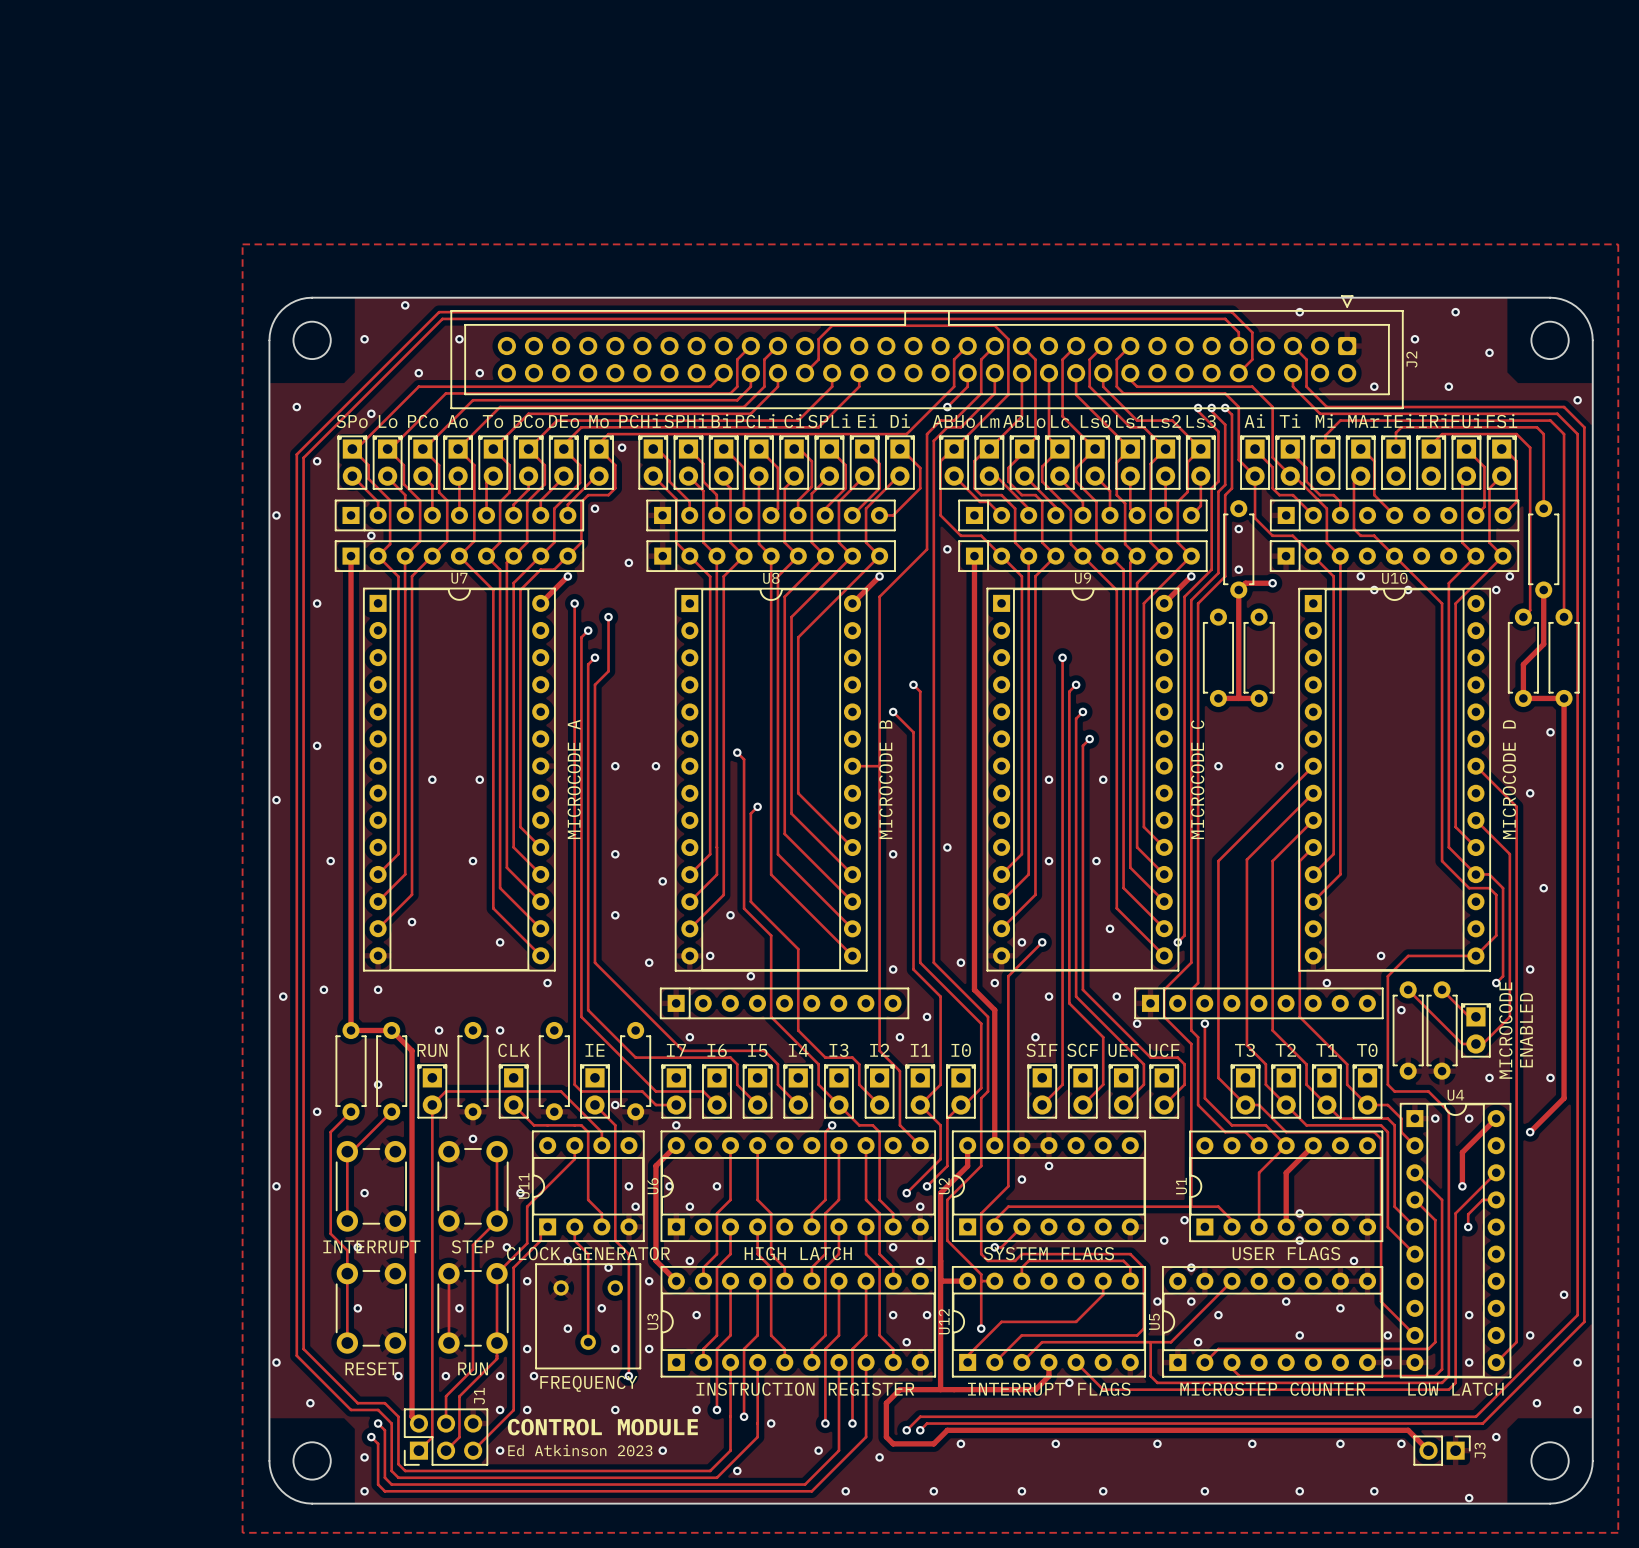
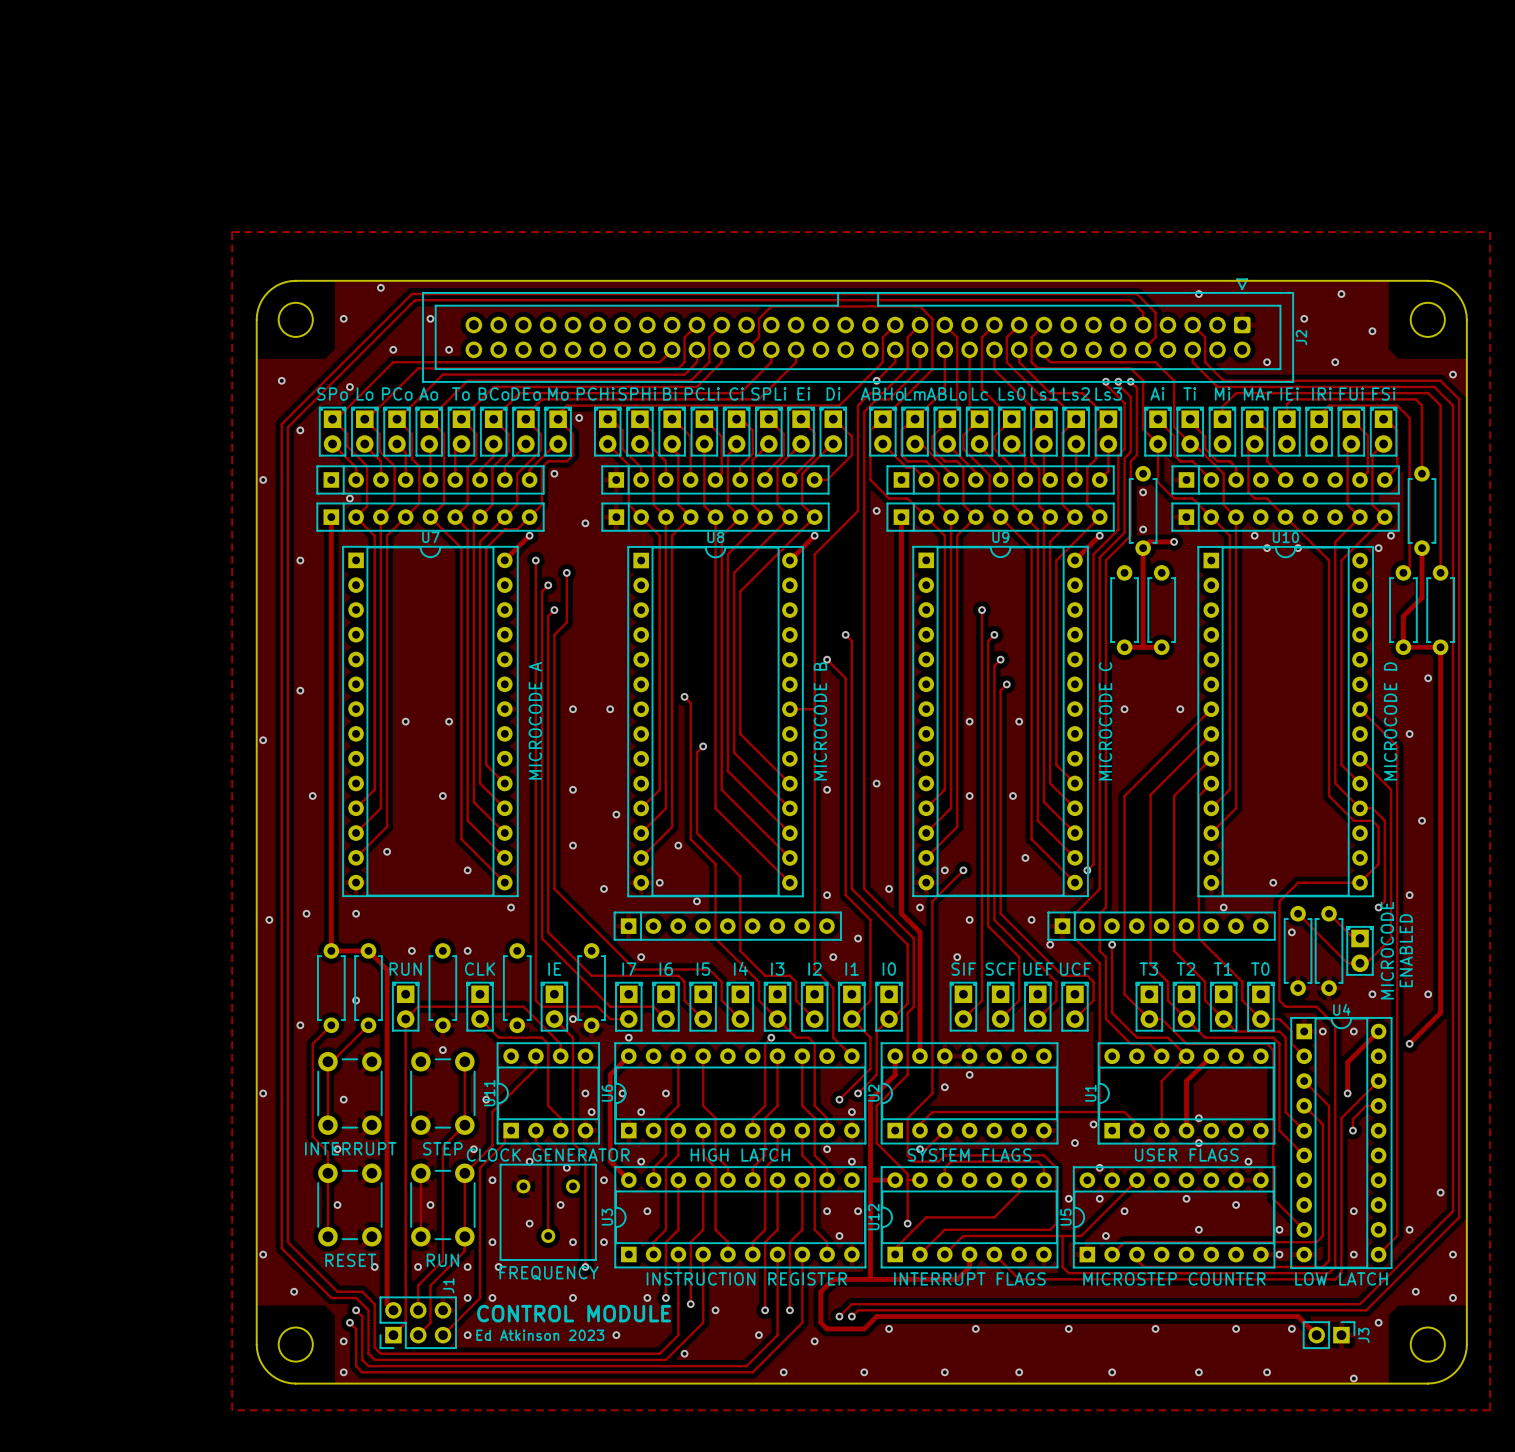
via: (1069, 1382) -> none

